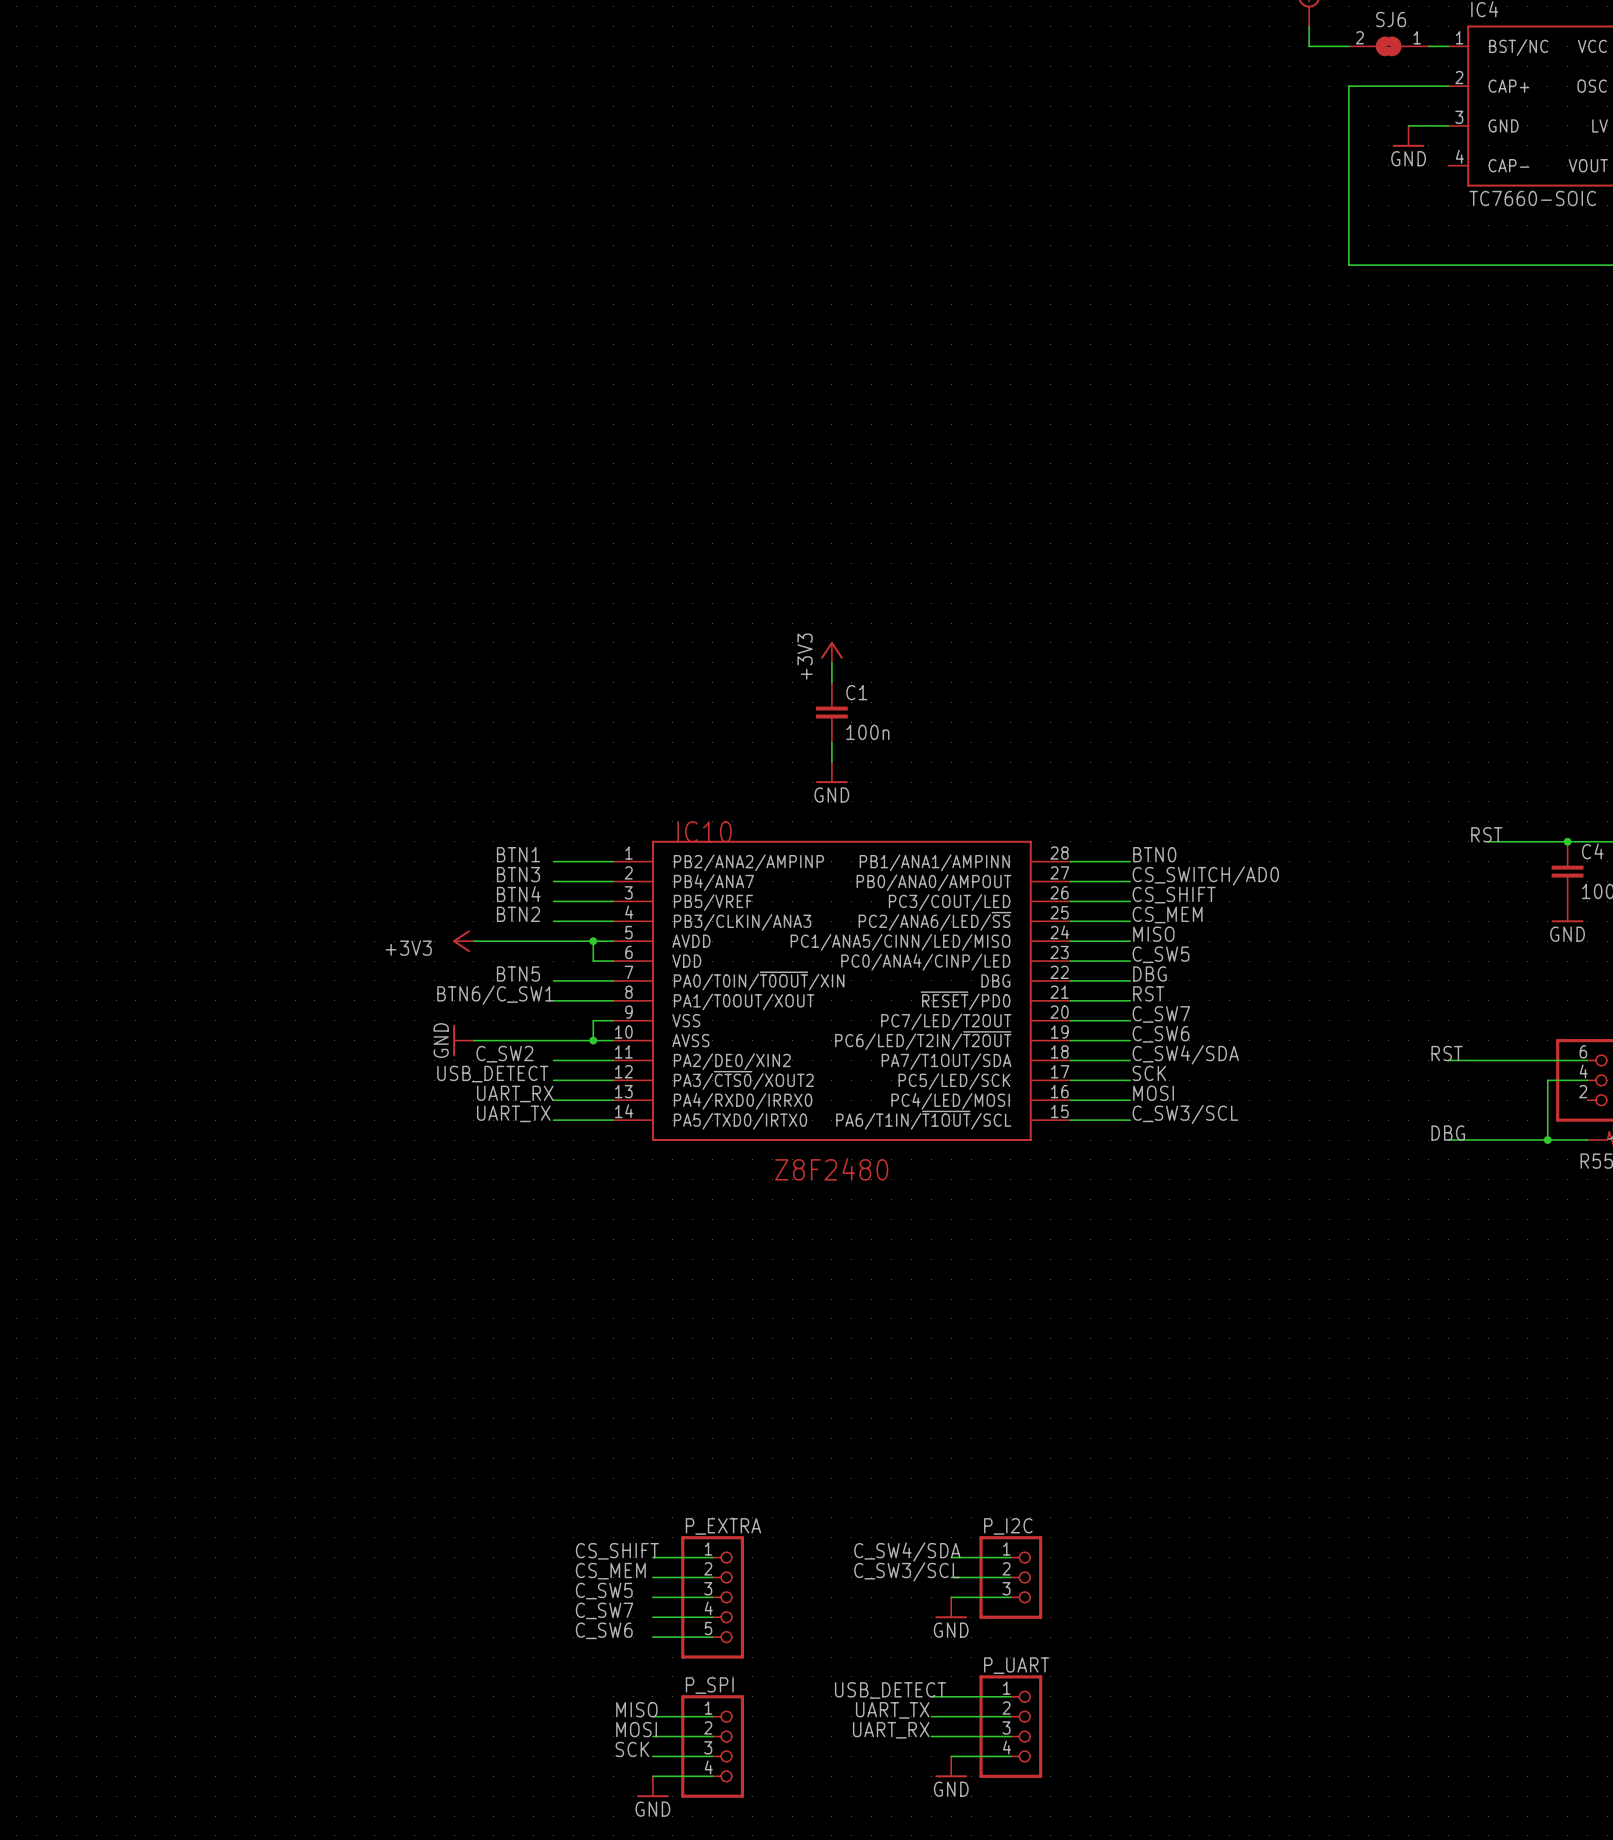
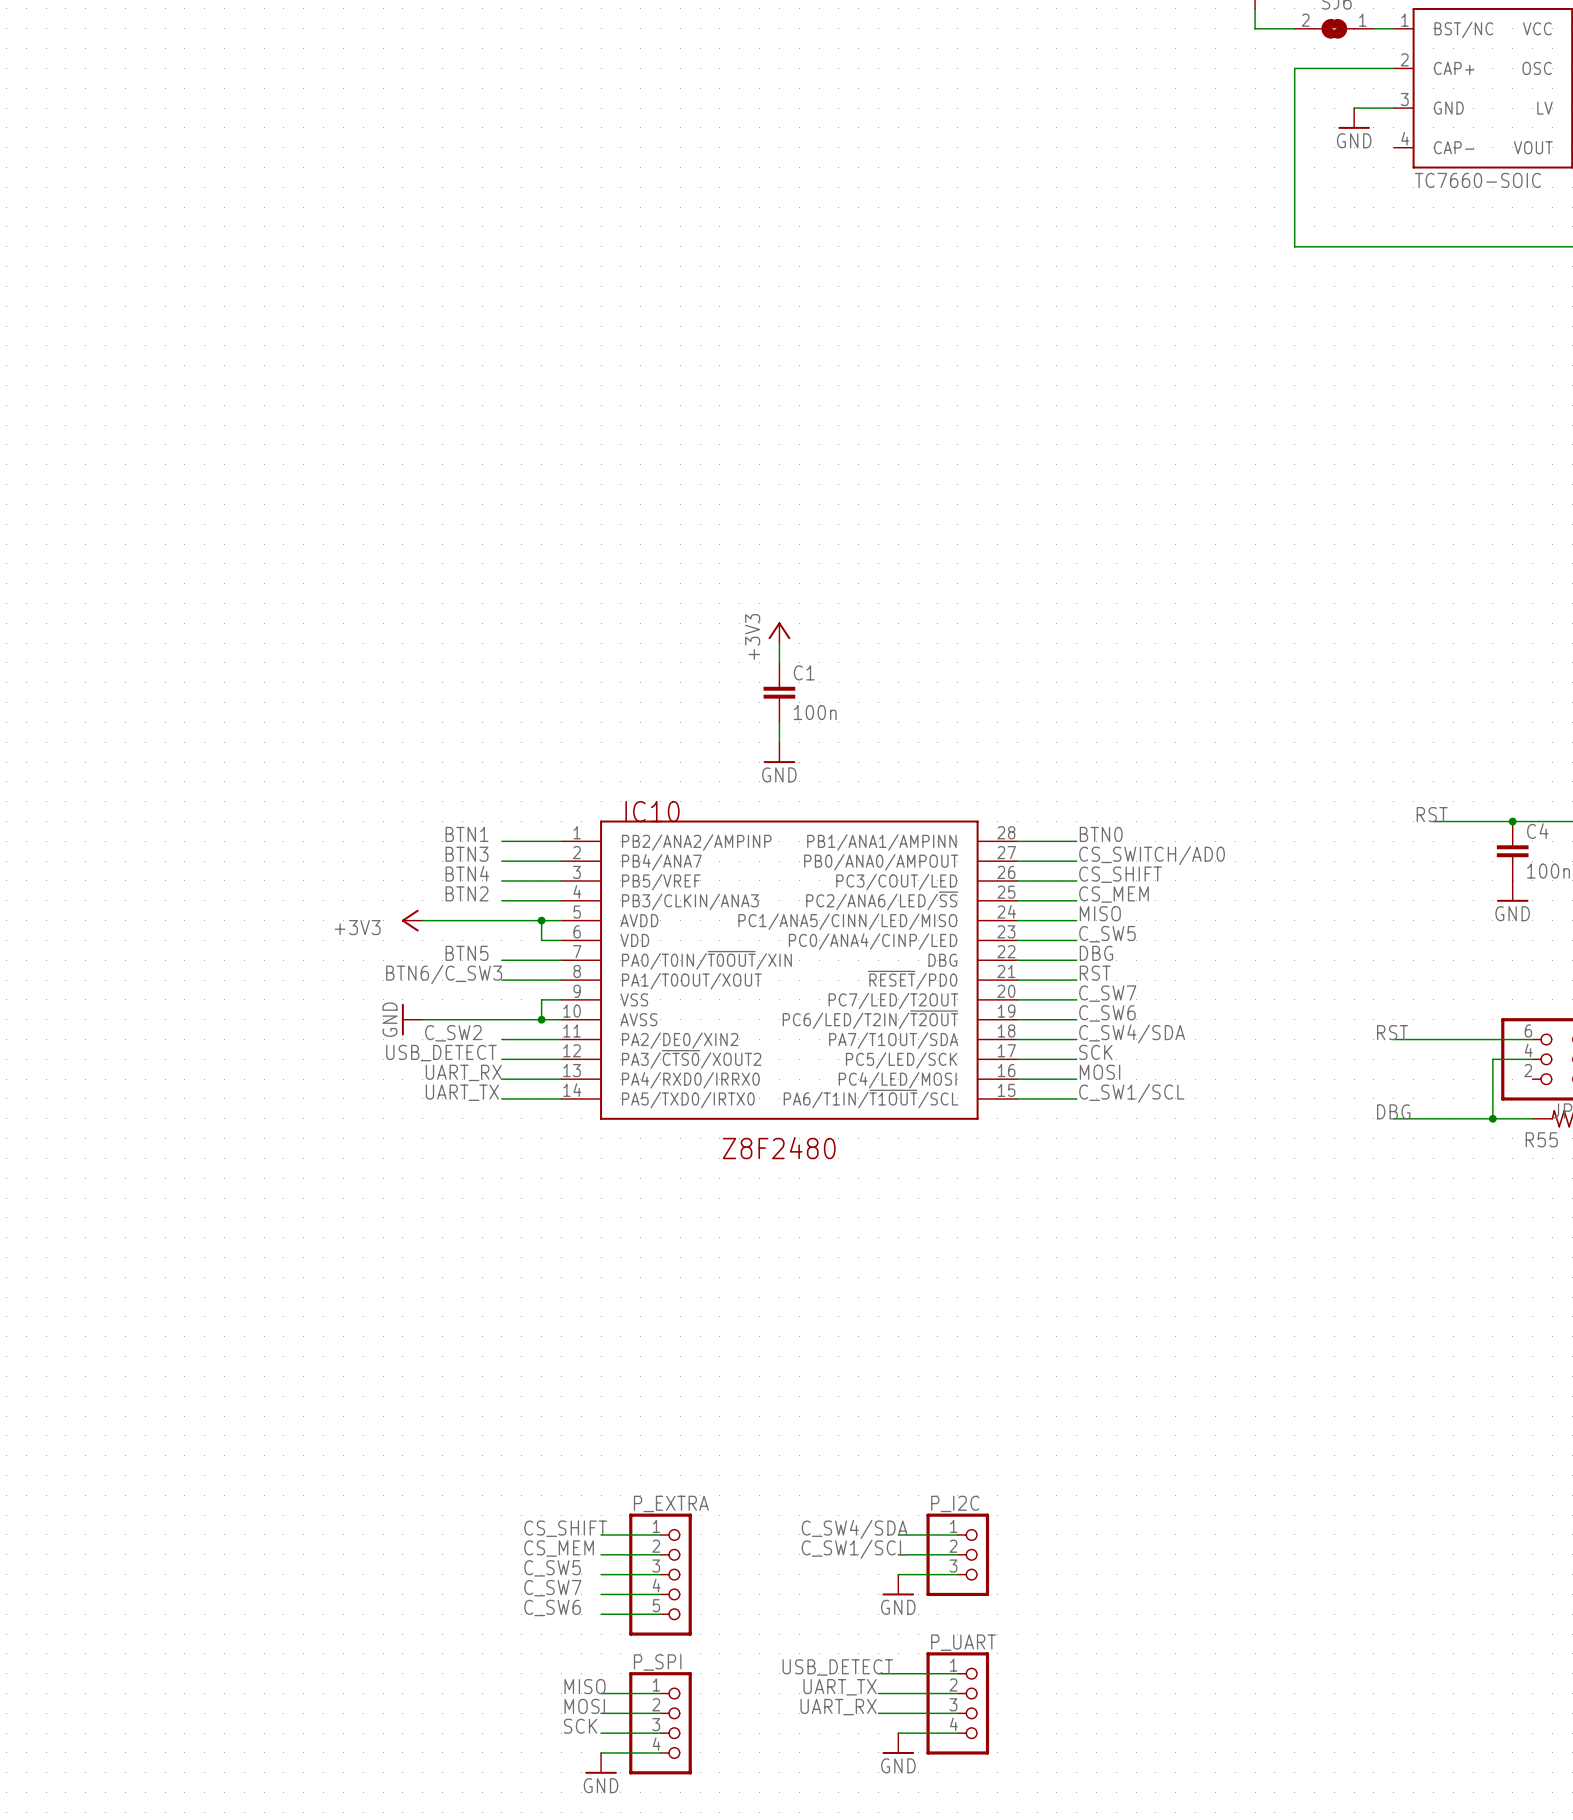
label: BTN6/C_SW1 (495, 995) -> BTN6/C_SW3 (444, 974)
label: C_SW3/SCL (1185, 1114) -> C_SW1/SCL (1131, 1093)
label: C_SW3/SCL (907, 1571) -> C_SW1/SCL (854, 1549)

